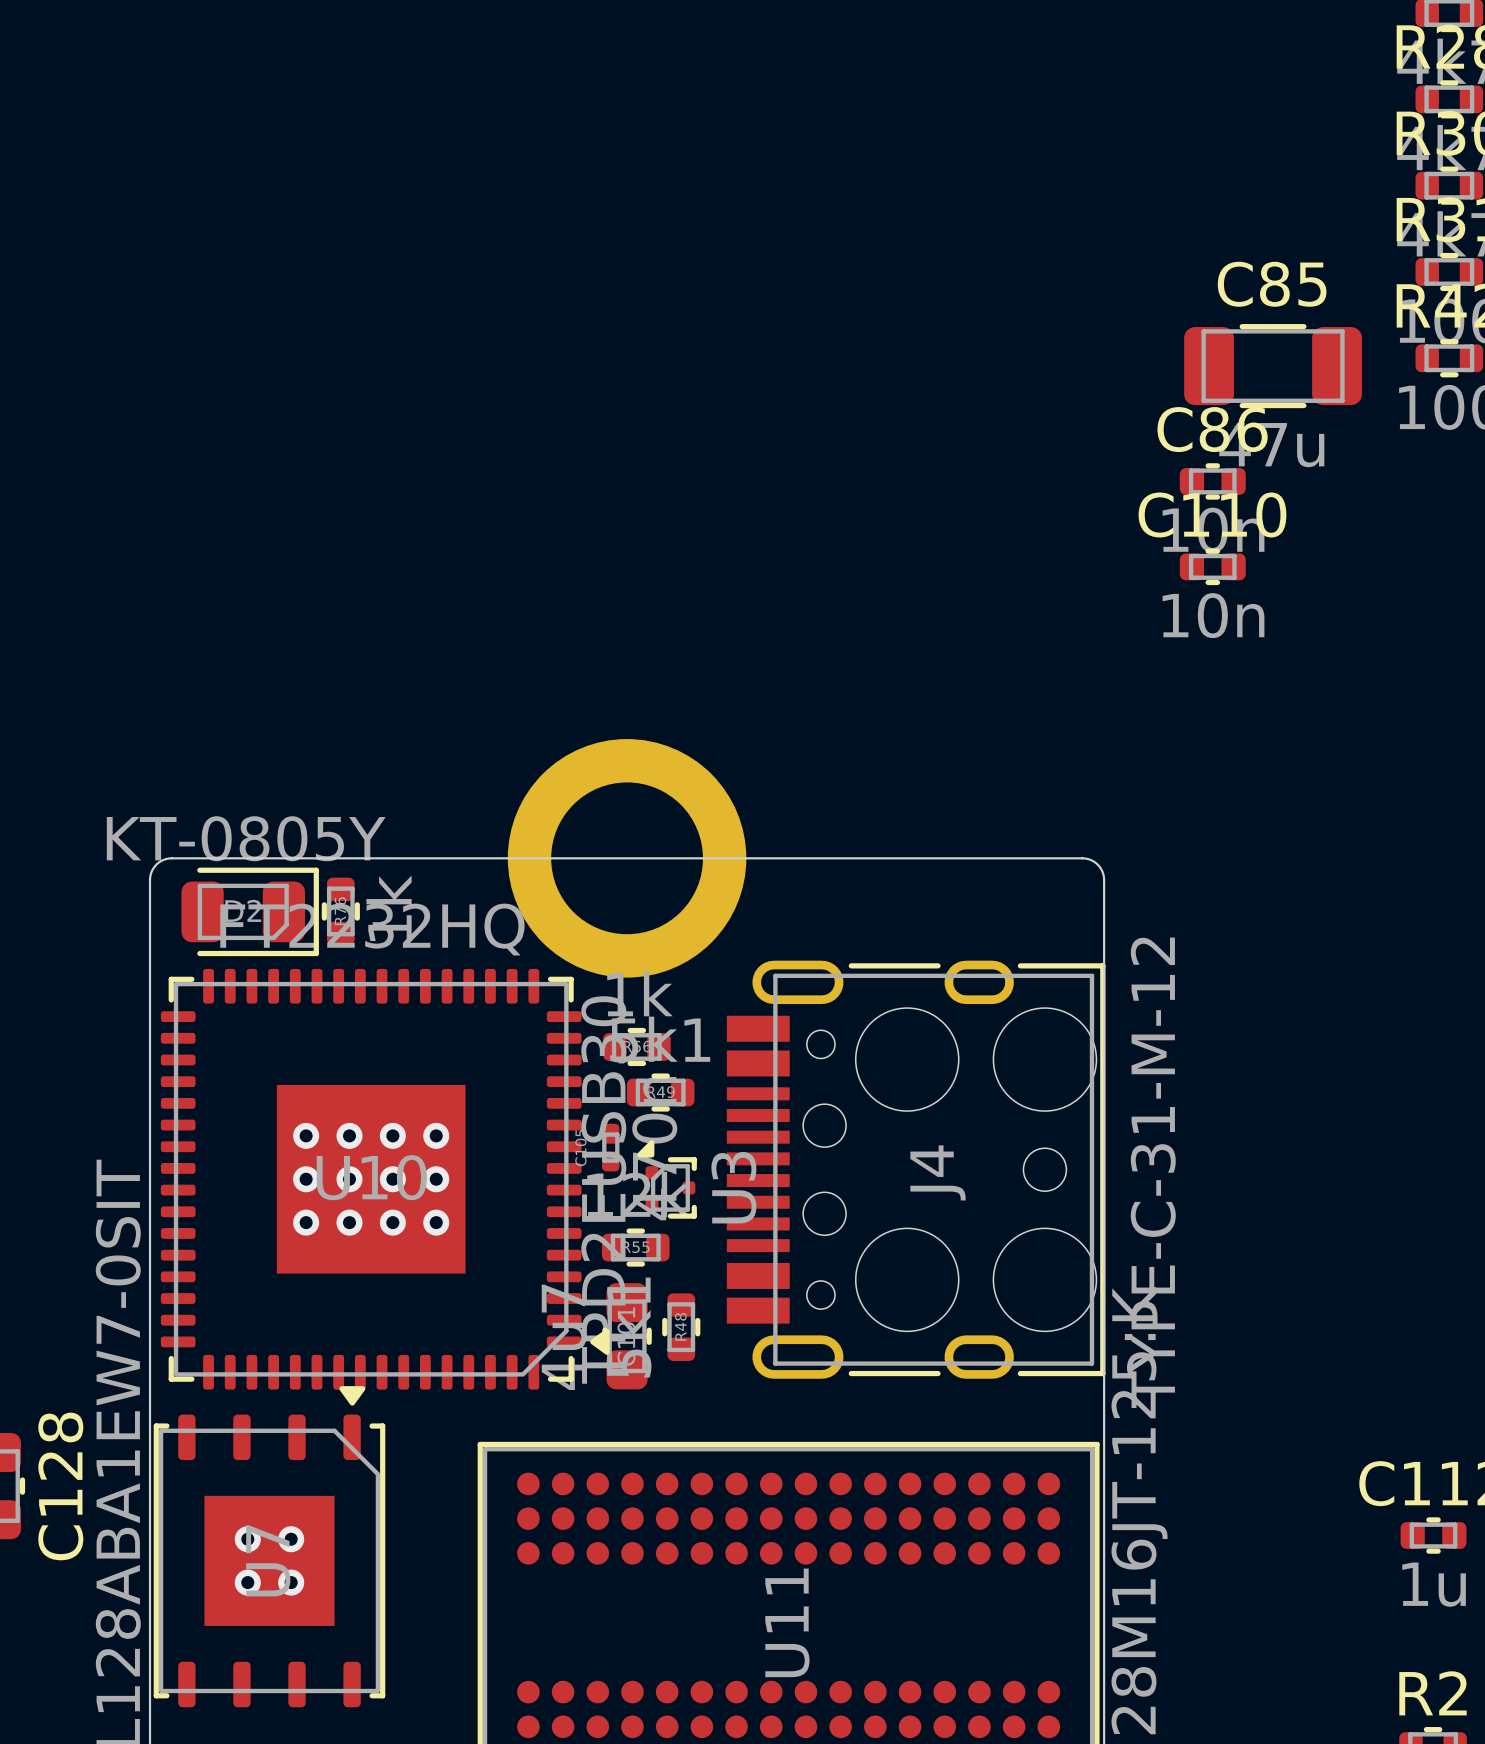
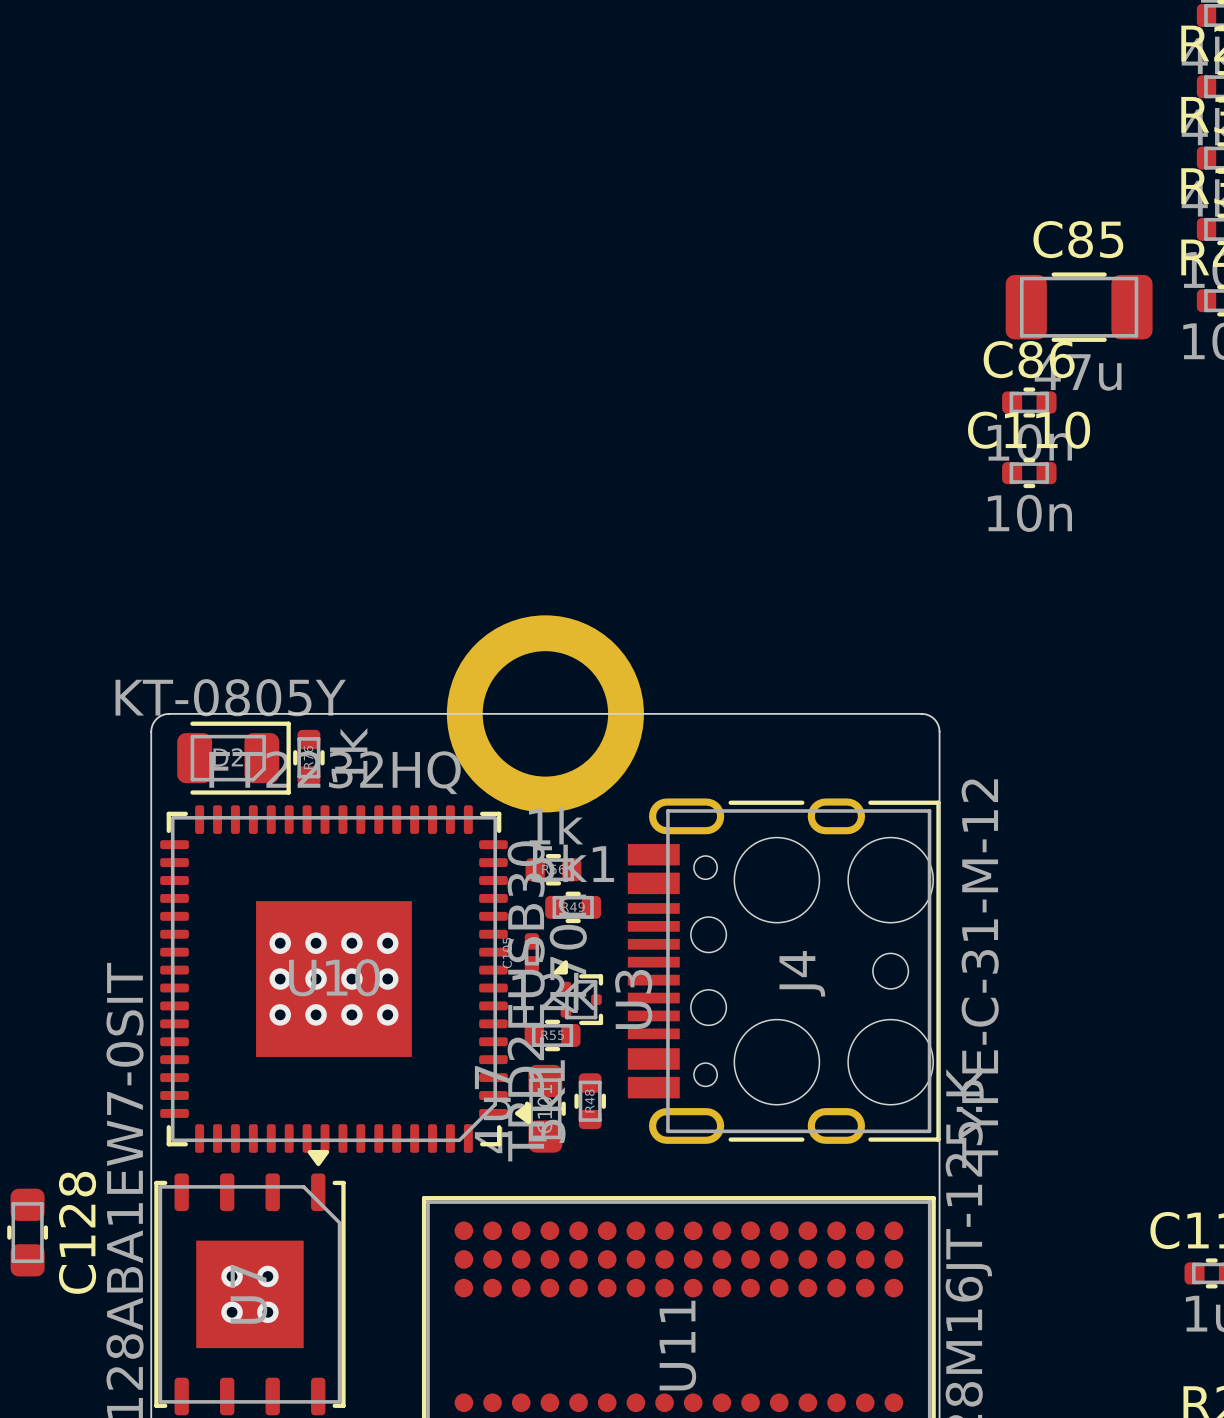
U3 position: (666, 1179) -> (578, 992)

